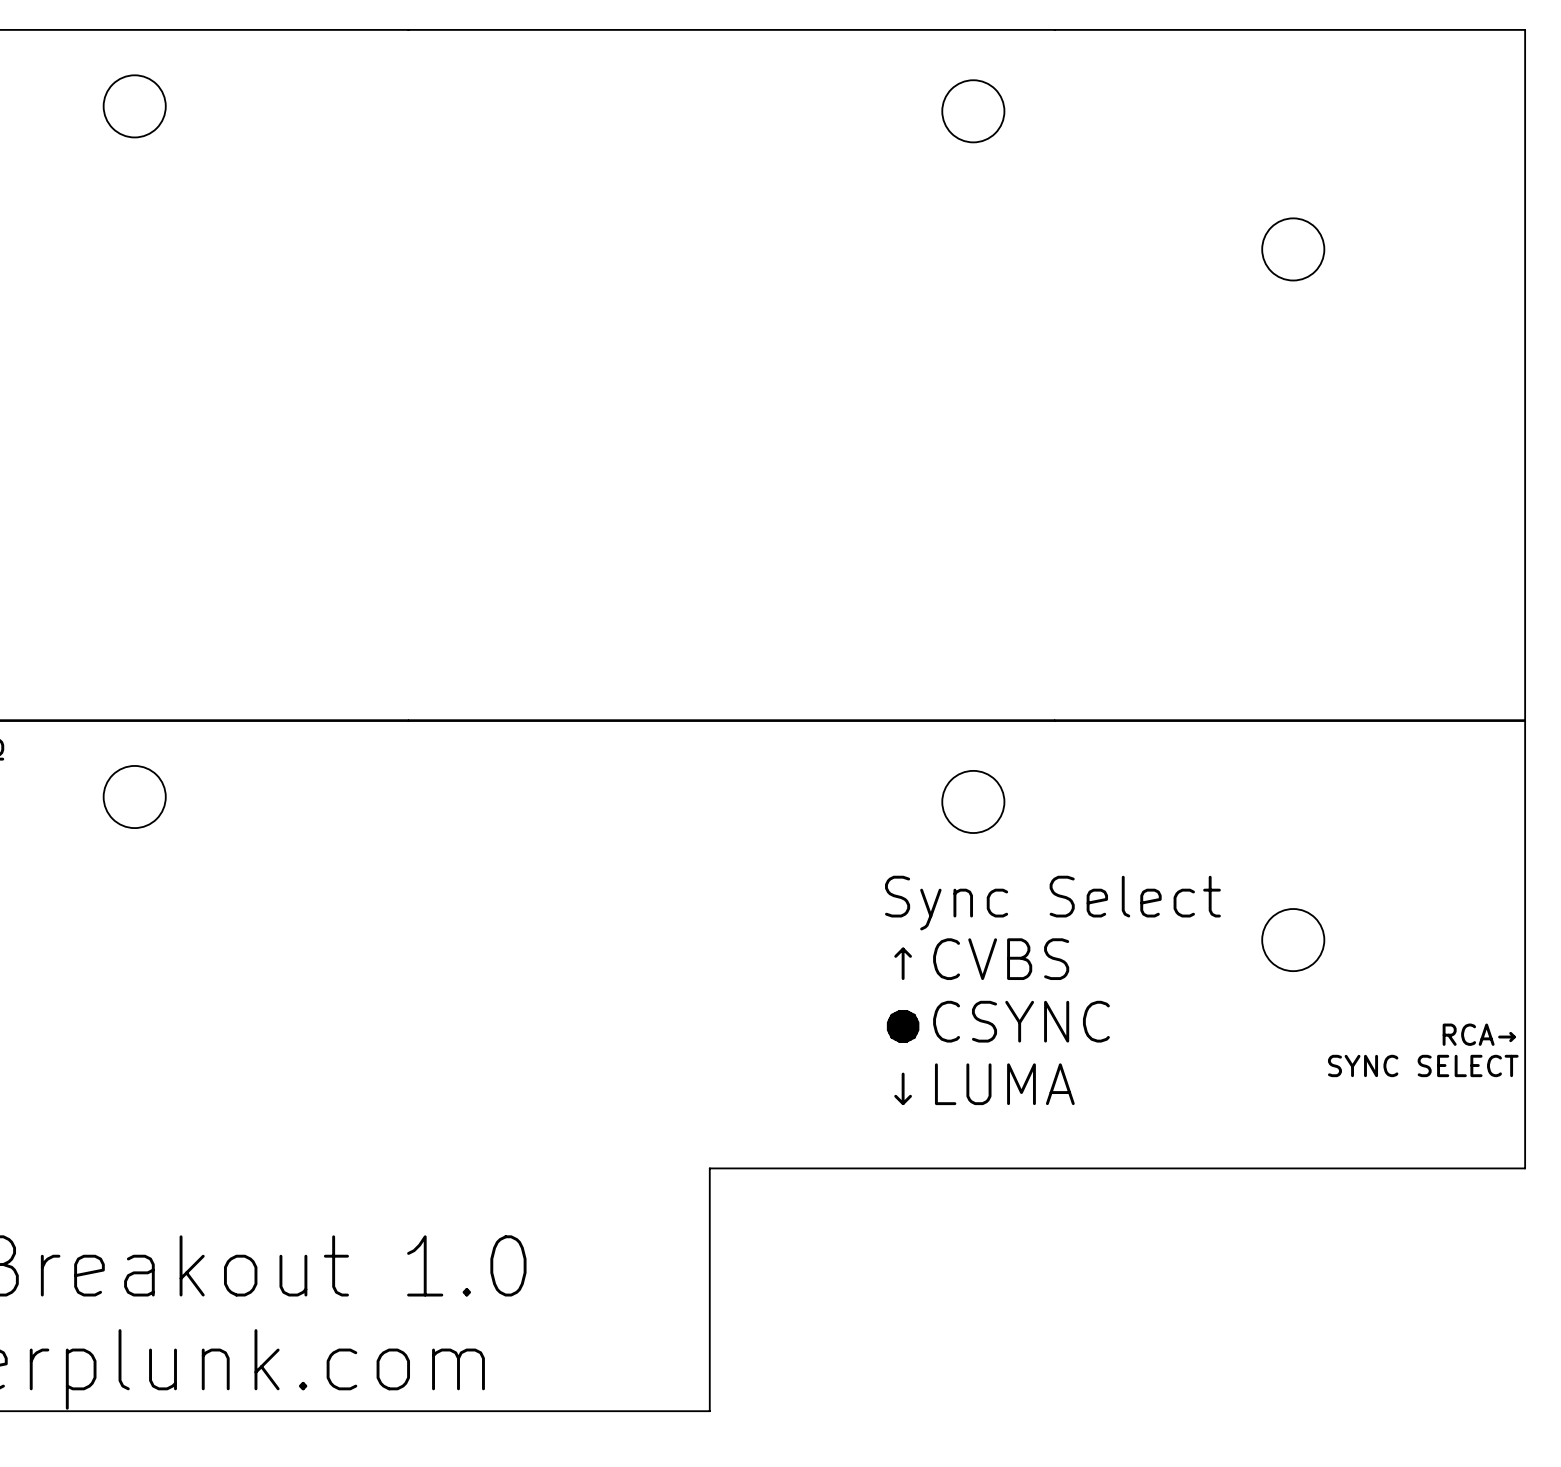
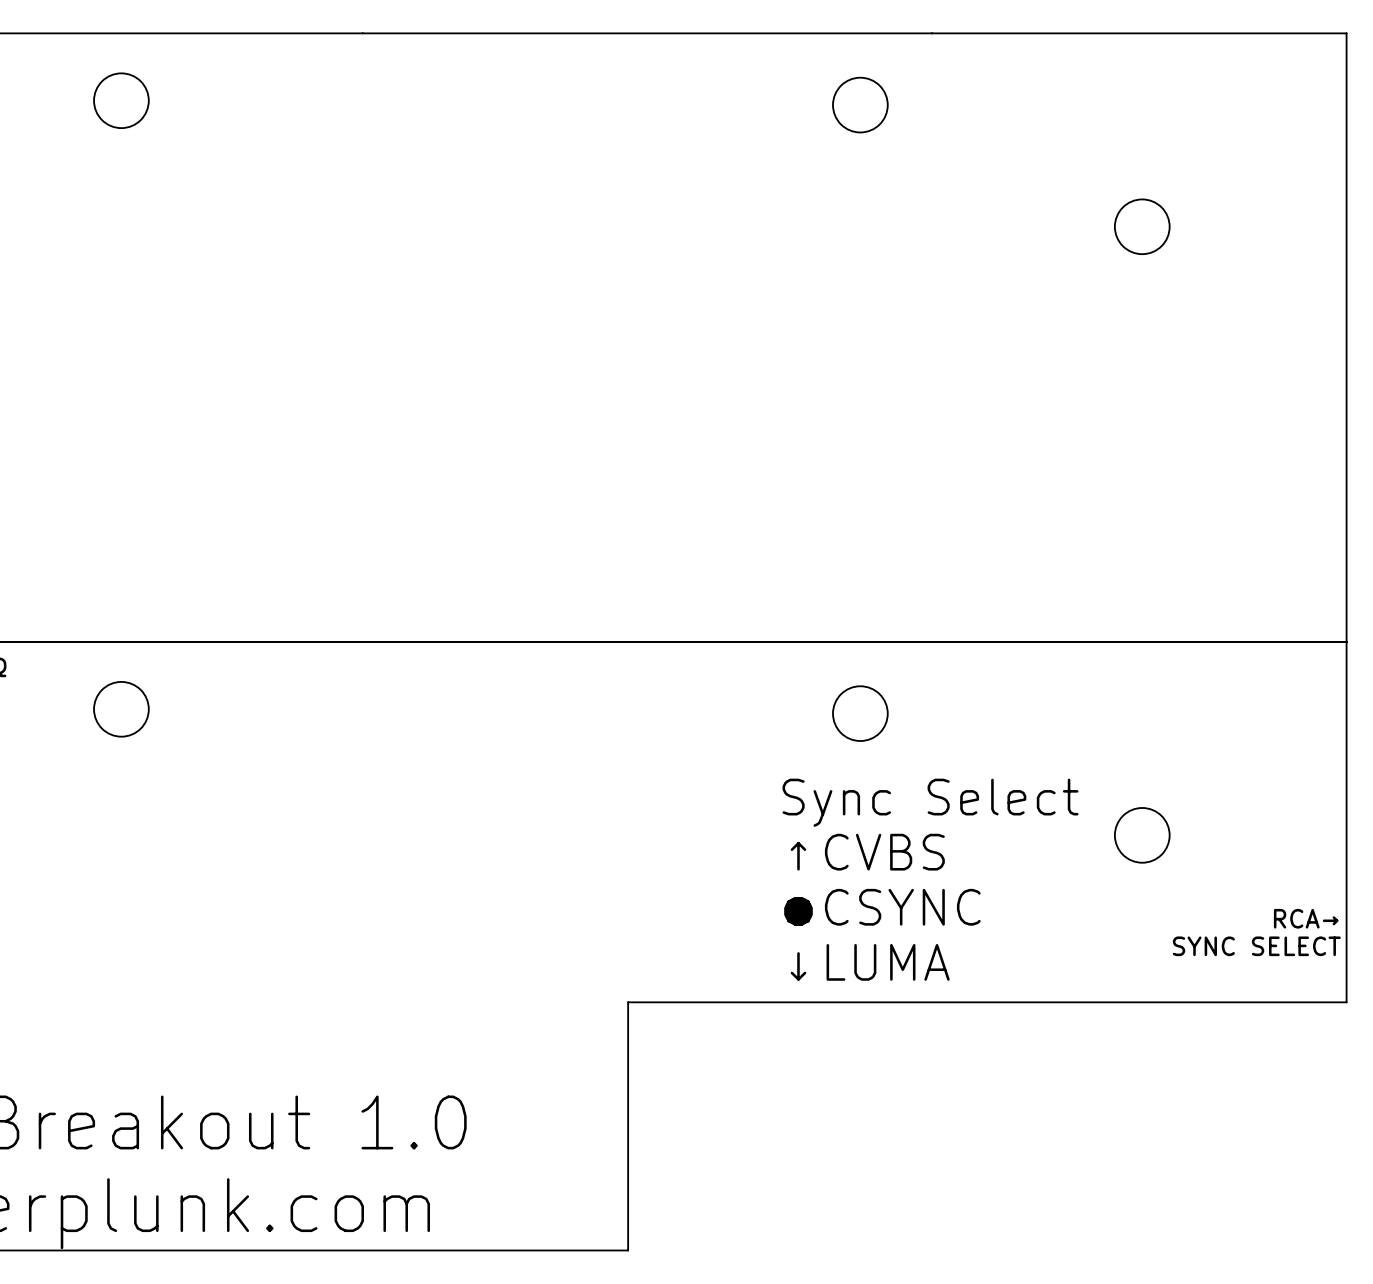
board edge: (1525, 1129) (1525, 1168) (709, 1168) -> (1346, 1002) (628, 1002) (628, 1036)

